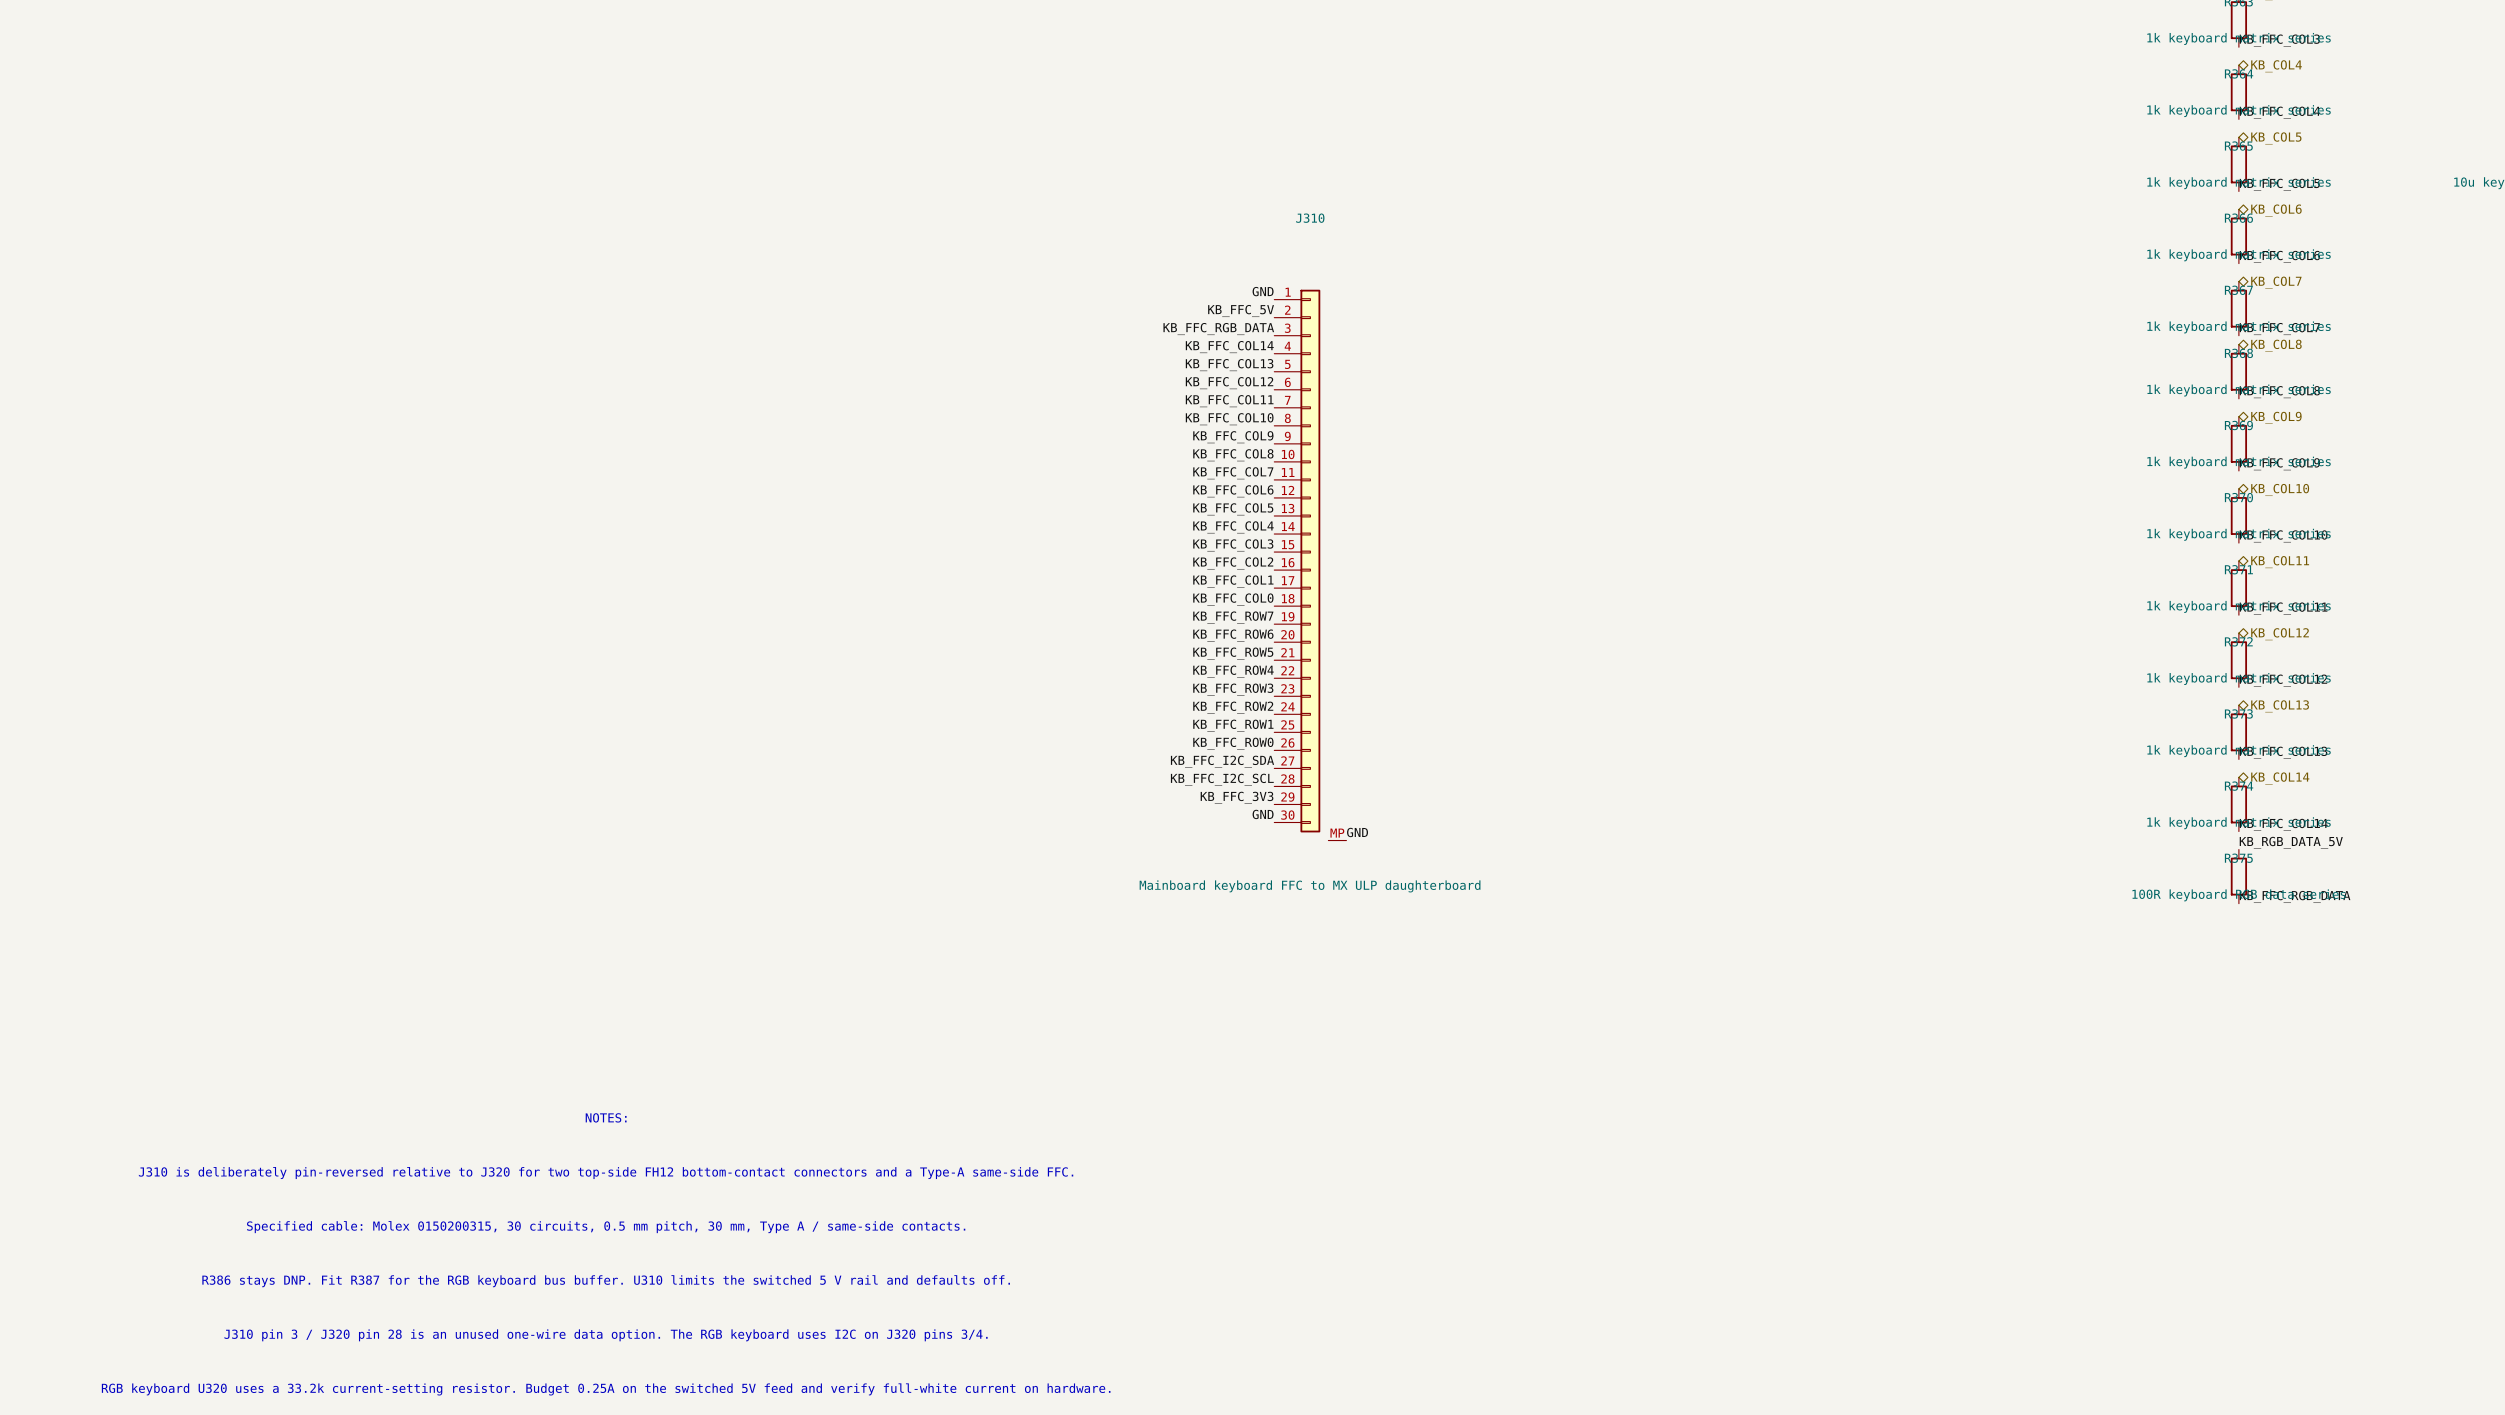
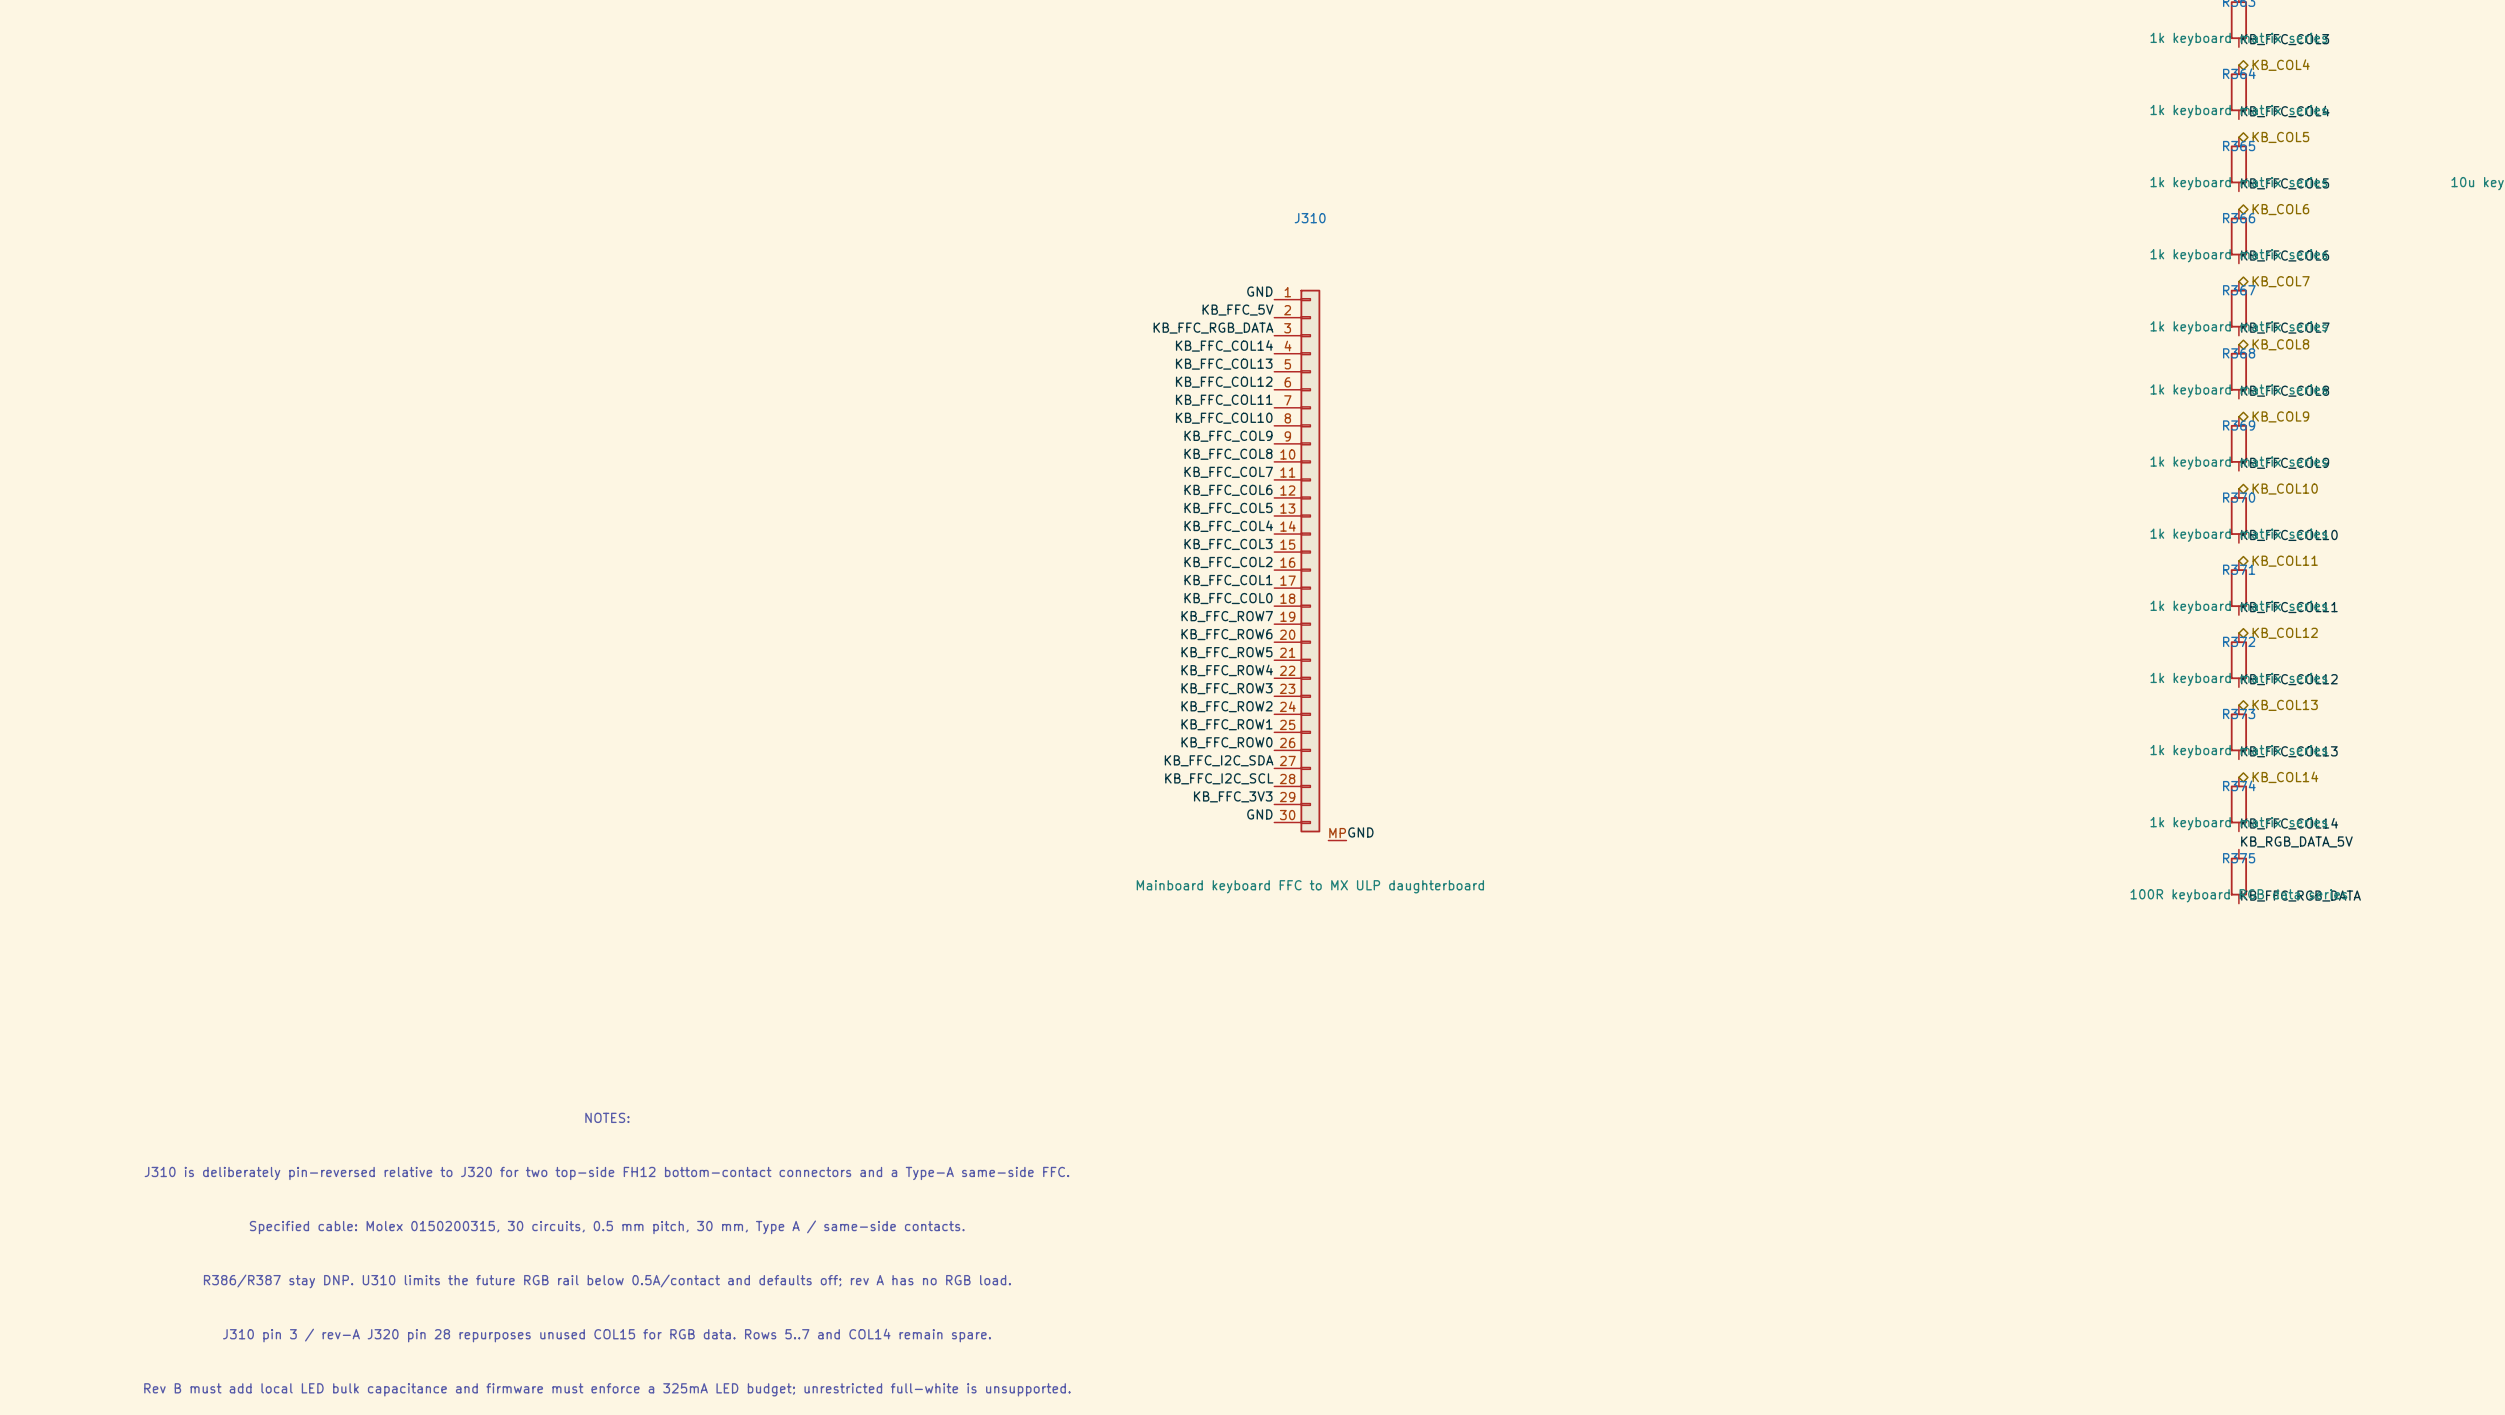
text: R386 stays DNP. Fit R387 for the RGB keyboard bus buffer. U310 limits the switched 5 V rail and defaults off. (606, 1281) -> R386/R387 stay DNP. U310 limits the future RGB rail below 0.5A/contact and defaults off; rev A has no RGB load. (607, 1281)
text: J310 pin 3 / J320 pin 28 is an unused one-wire data option. The RGB keyboard uses I2C on J320 pins 3/4. (606, 1335) -> J310 pin 3 / rev-A J320 pin 28 repurposes unused COL15 for RGB data. Rows 5..7 and COL14 remain spare. (606, 1335)
text: RGB keyboard U320 uses a 33.2k current-setting resistor. Budget 0.25A on the switched 5V feed and verify full-white current on hardware. (606, 1389) -> Rev B must add local LED bulk capacitance and firmware must enforce a 325mA LED budget; unrestricted full-white is unsupported. (607, 1389)

